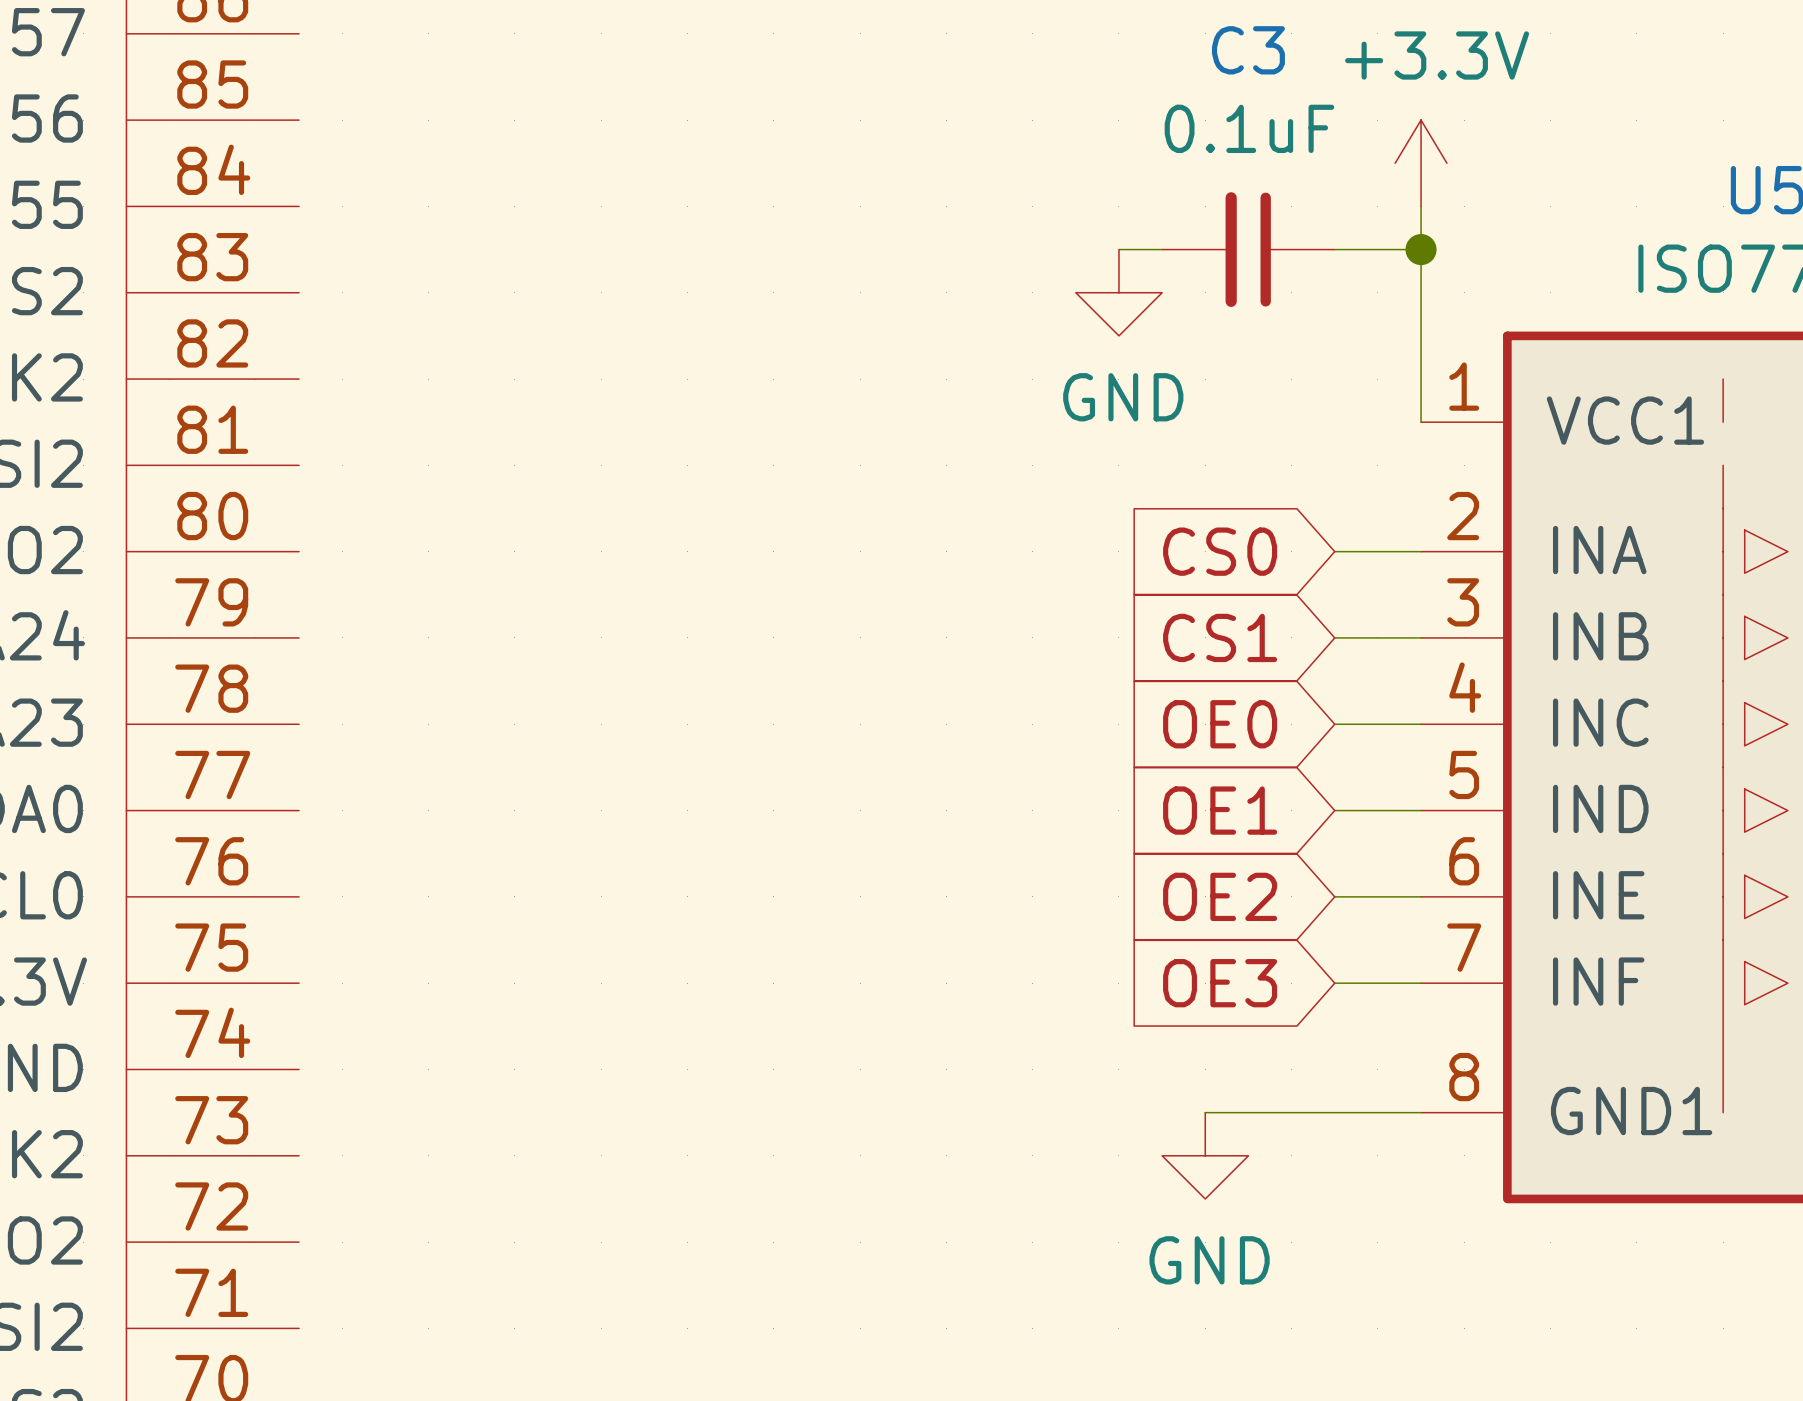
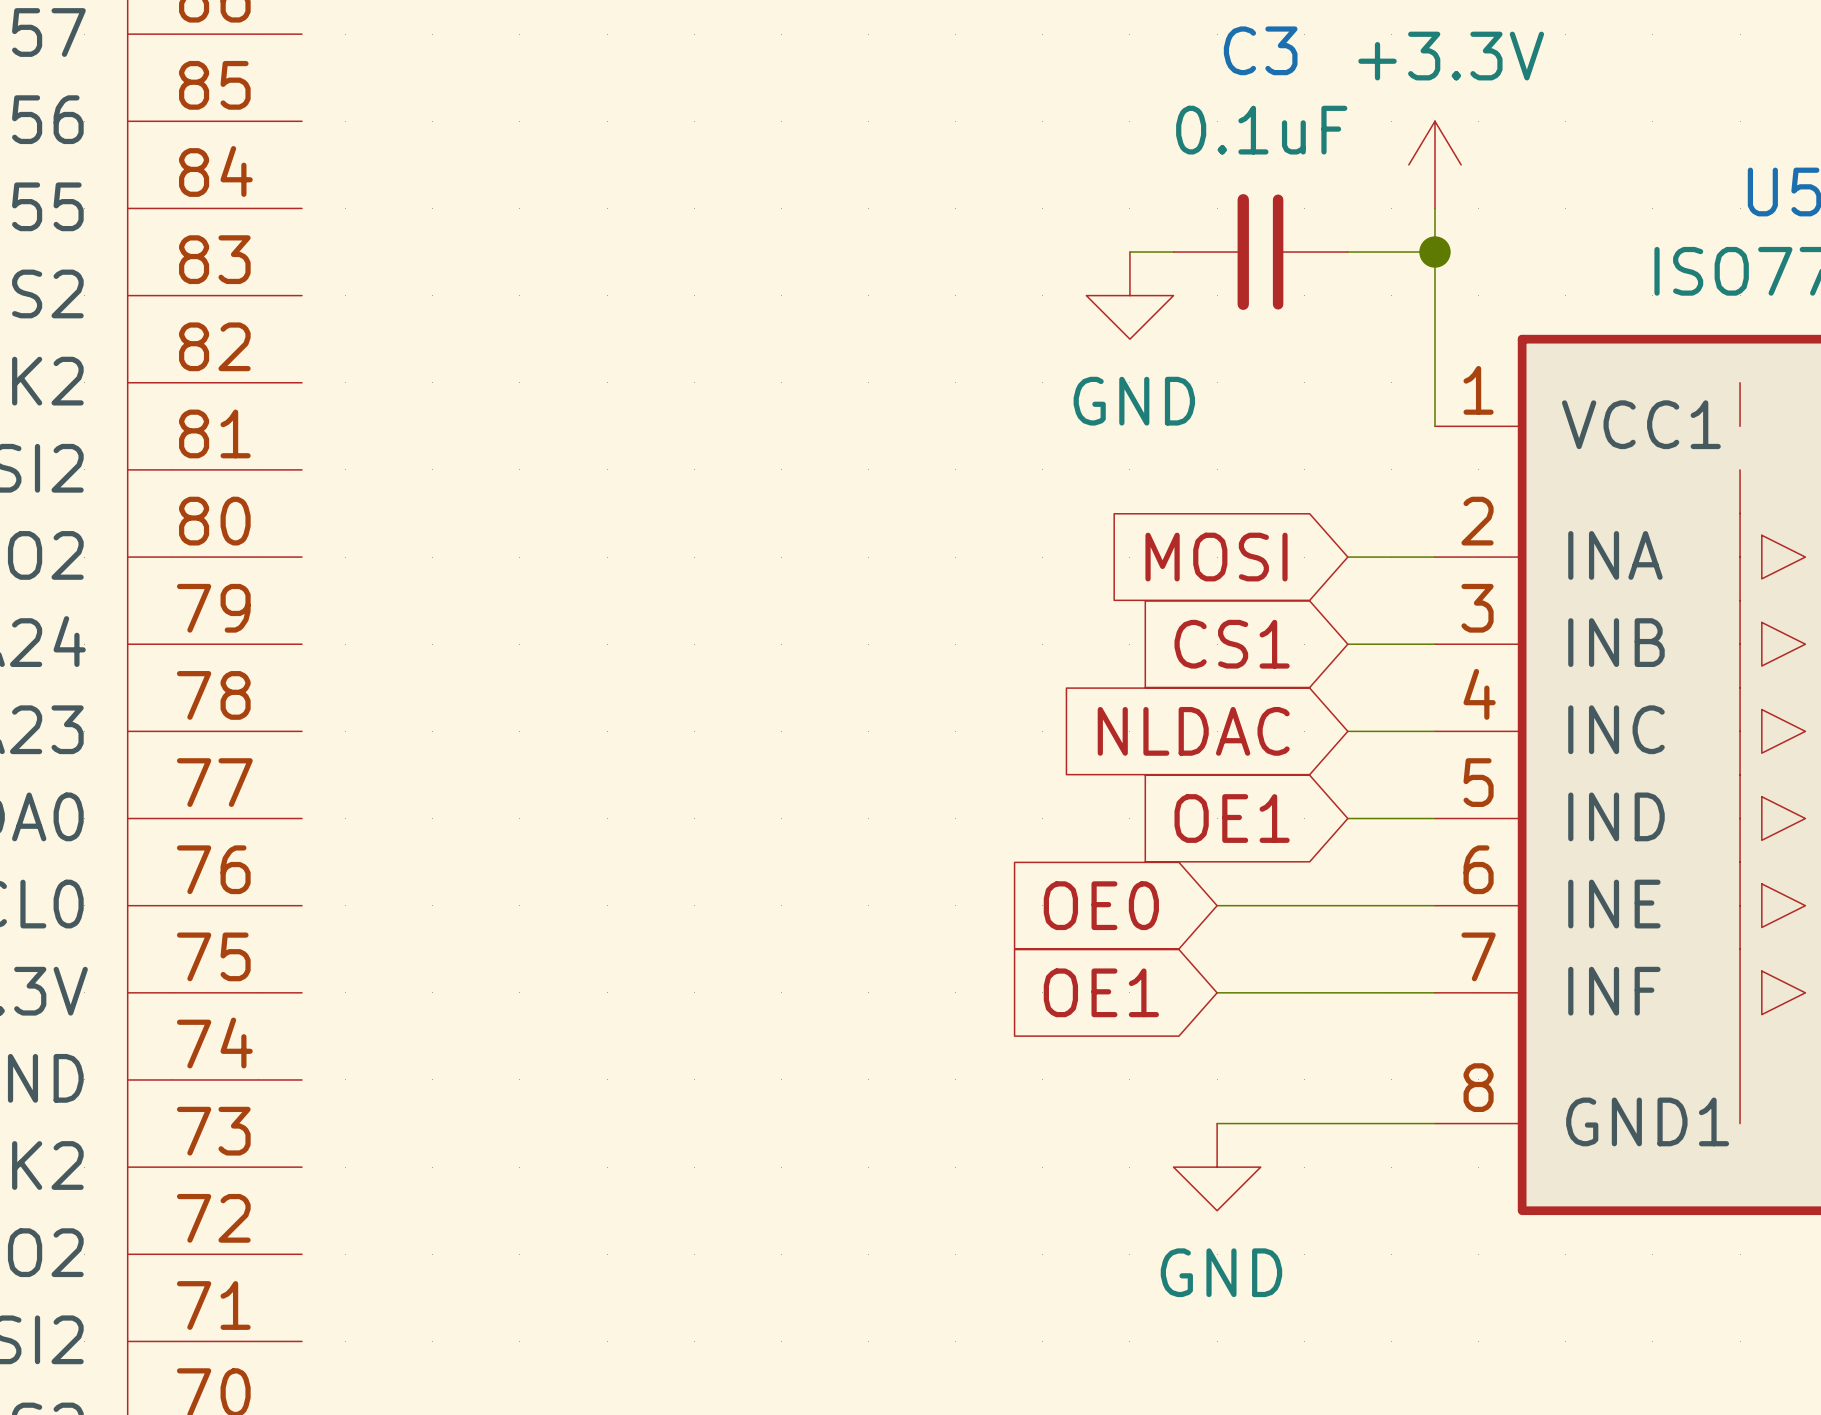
global label: CS0 (1220, 551) -> MOSI (1216, 557)
global label: OE0 (1220, 724) -> NLDAC (1193, 731)
global label: none -> OE0 (1101, 905)
wire: none -> (1217, 905) (1347, 905)
global label: OE2 (1220, 896) -> none
global label: none -> OE1 (1101, 992)
wire: none -> (1217, 992) (1347, 992)
global label: OE3 (1220, 983) -> none

